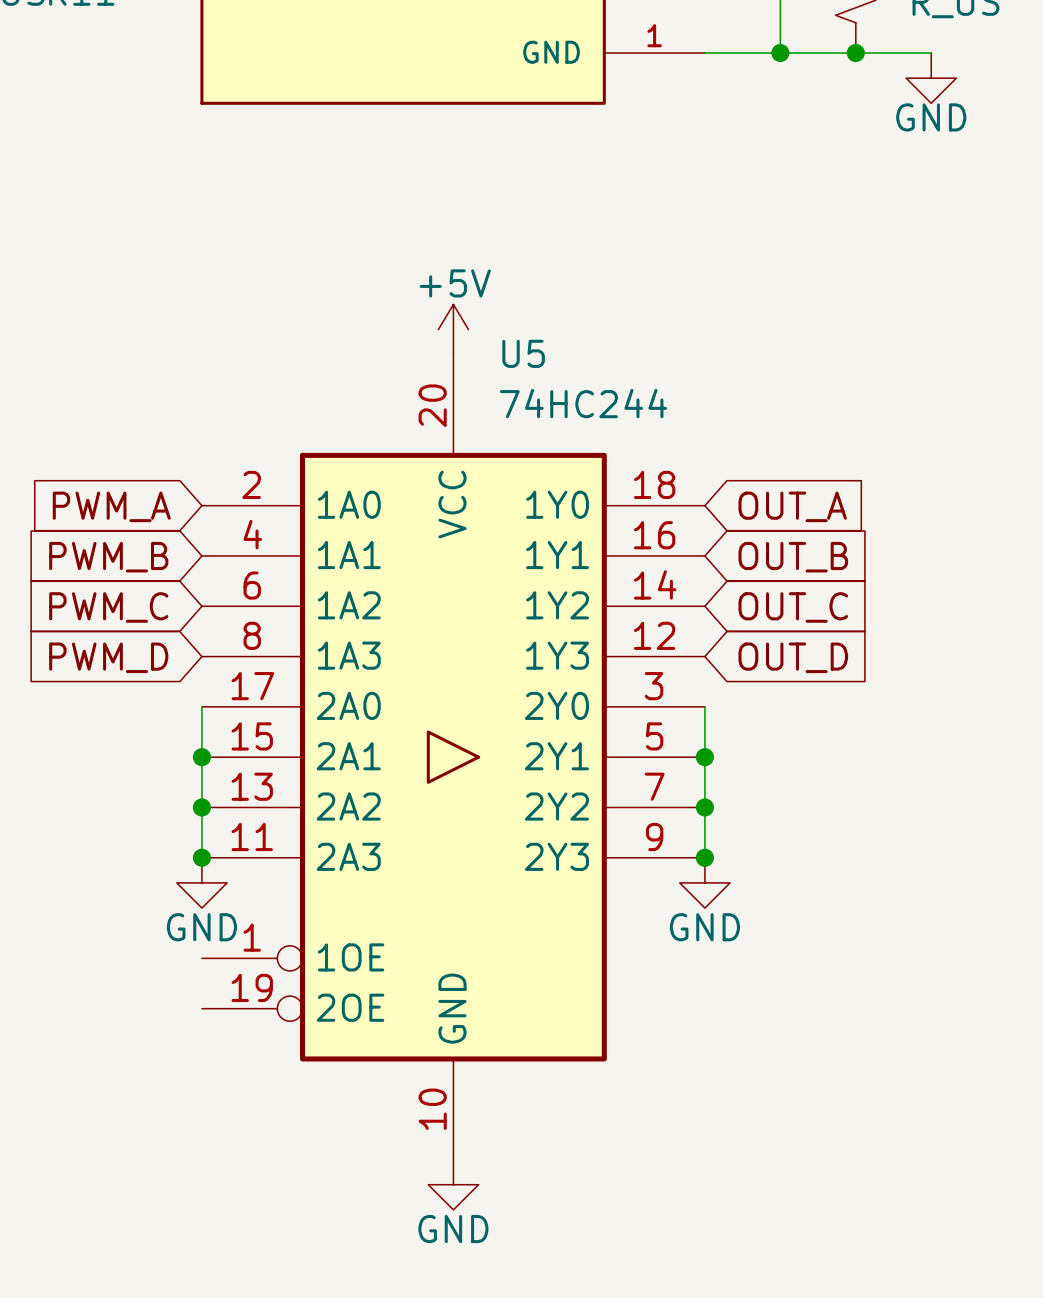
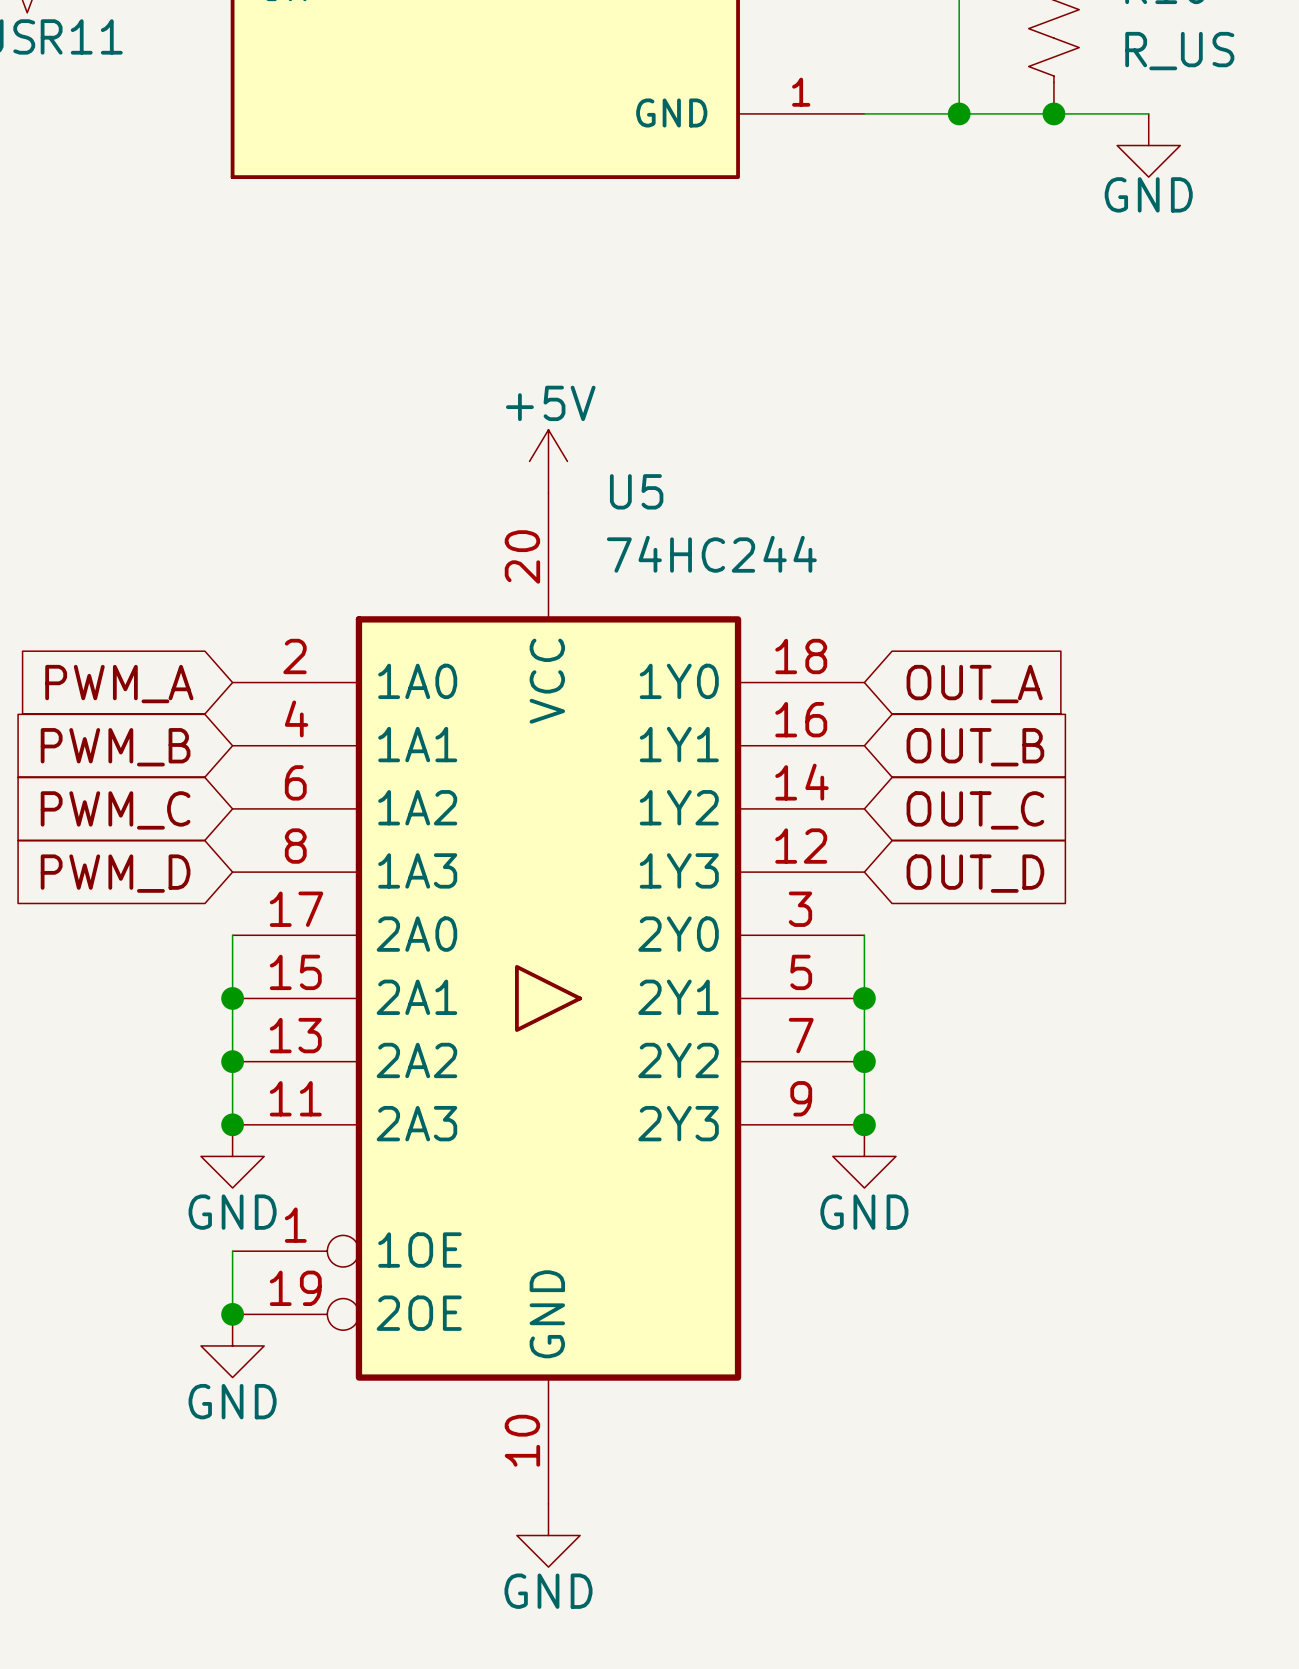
wire: none -> (232, 1251) (232, 1314)
junction: none -> (232, 1314)
power symbol: none -> GND (232, 1345)

